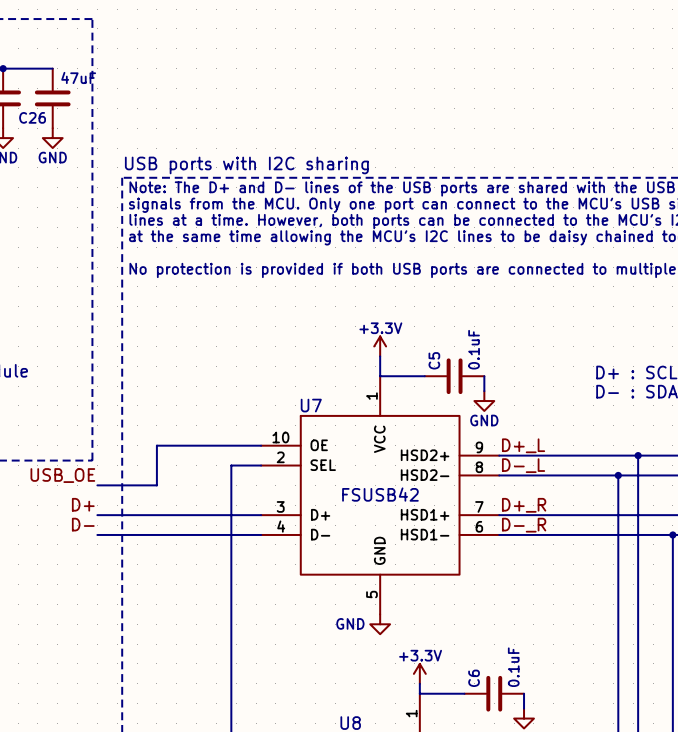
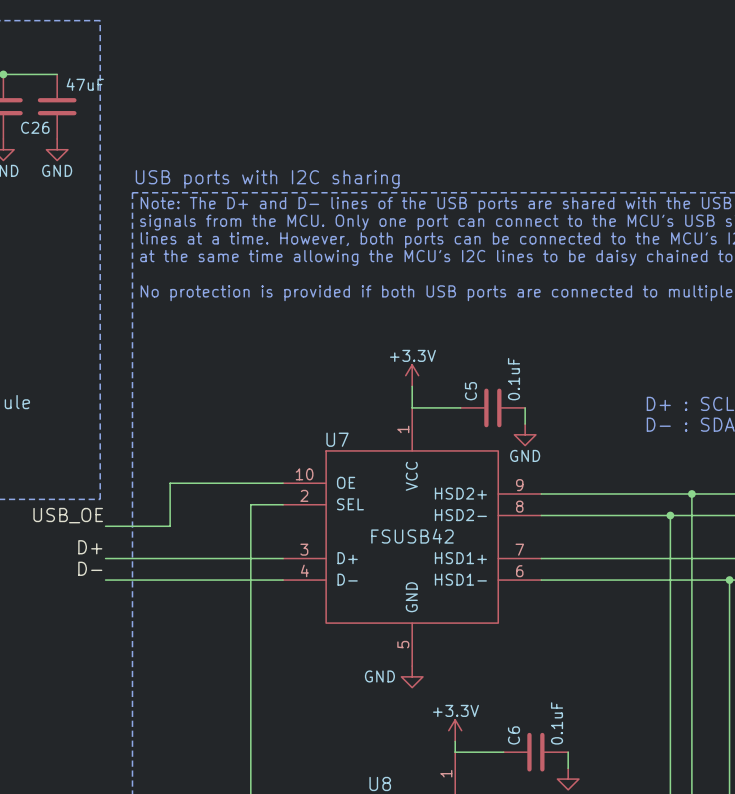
label: D+_L (523, 445) -> none
label: D-_L (523, 465) -> none
label: D+_R (524, 505) -> none
label: D-_R (524, 525) -> none

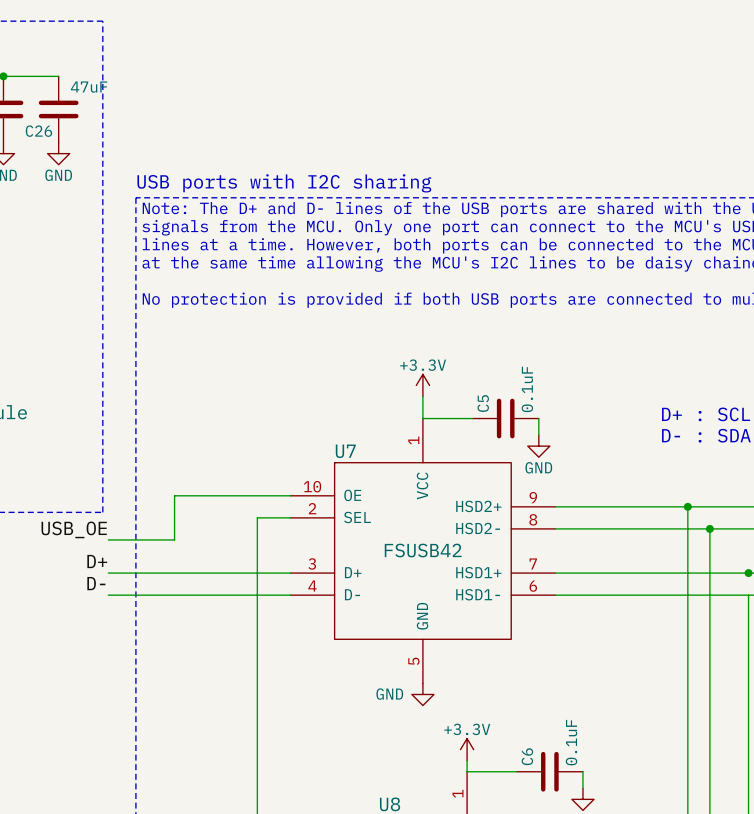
junction: none -> (687, 506)
wire: (691, 493) (691, 515) -> (687, 506) (687, 528)
junction: (691, 493) -> none
junction: (670, 515) -> none
junction: none -> (709, 528)
junction: none -> (748, 573)
junction: (729, 580) -> none

